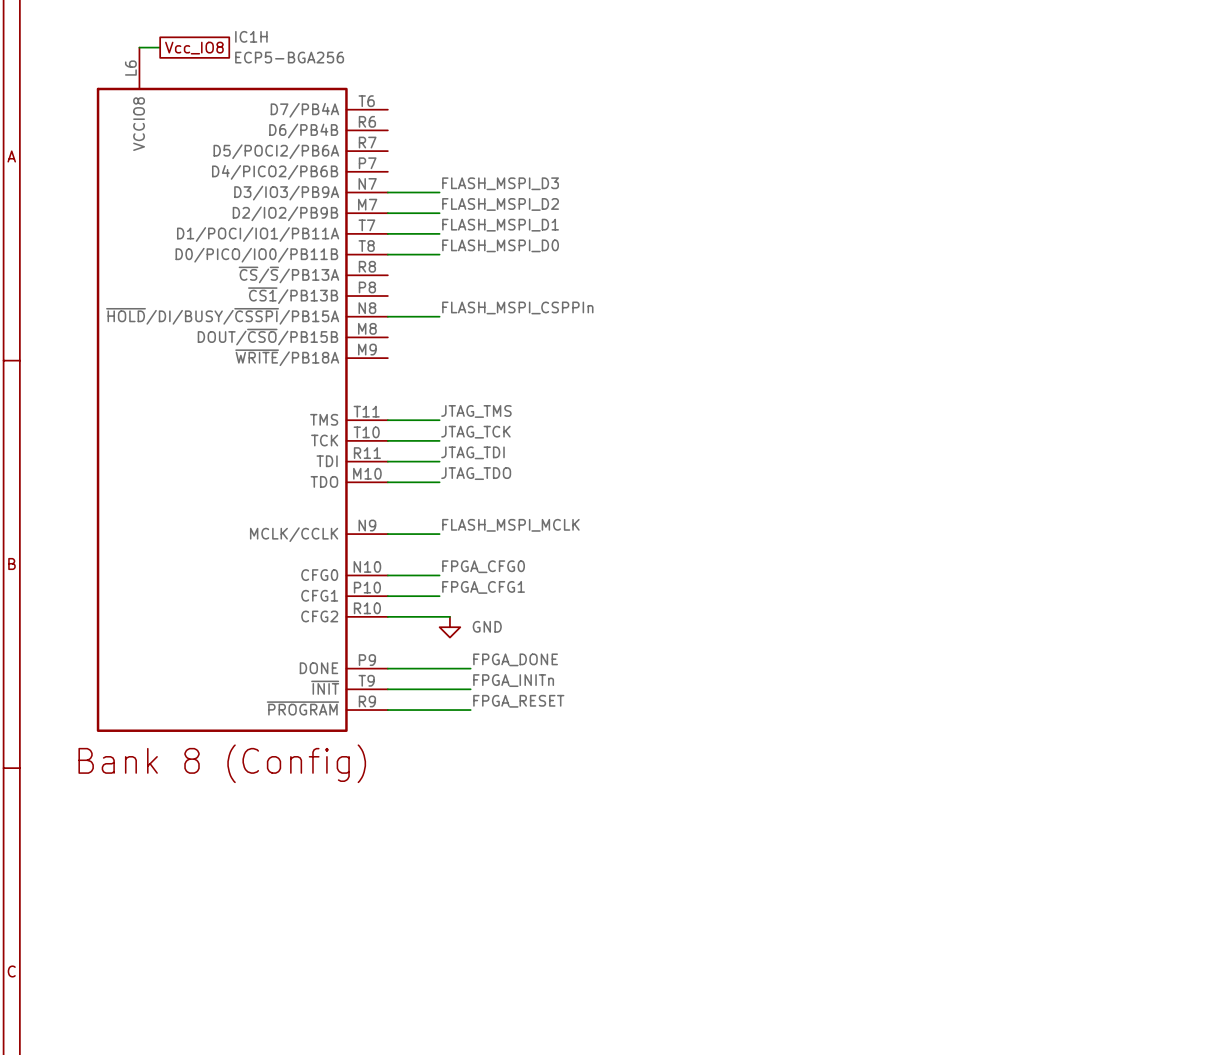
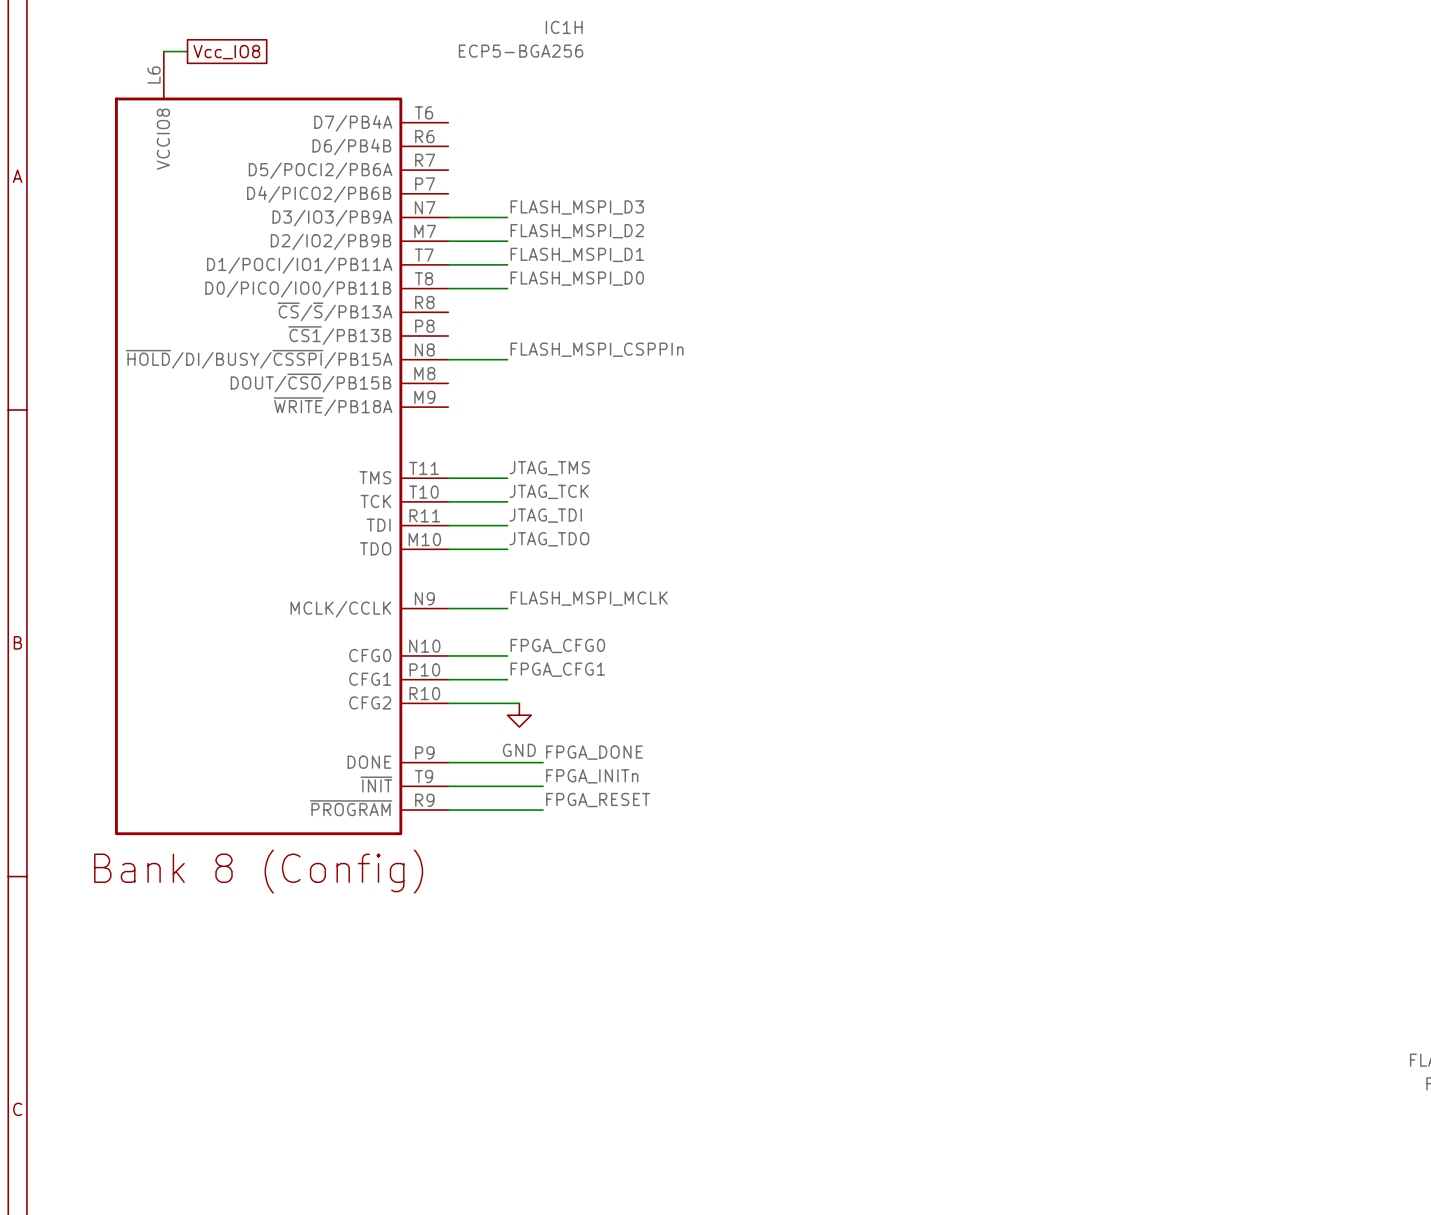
IC1H name position: IC1H (251, 36) -> IC1H (564, 27)
IC1H value position: ECP5-BGA256 (289, 57) -> ECP5-BGA256 (521, 51)
power symbol text position: GND (487, 626) -> GND (519, 750)

